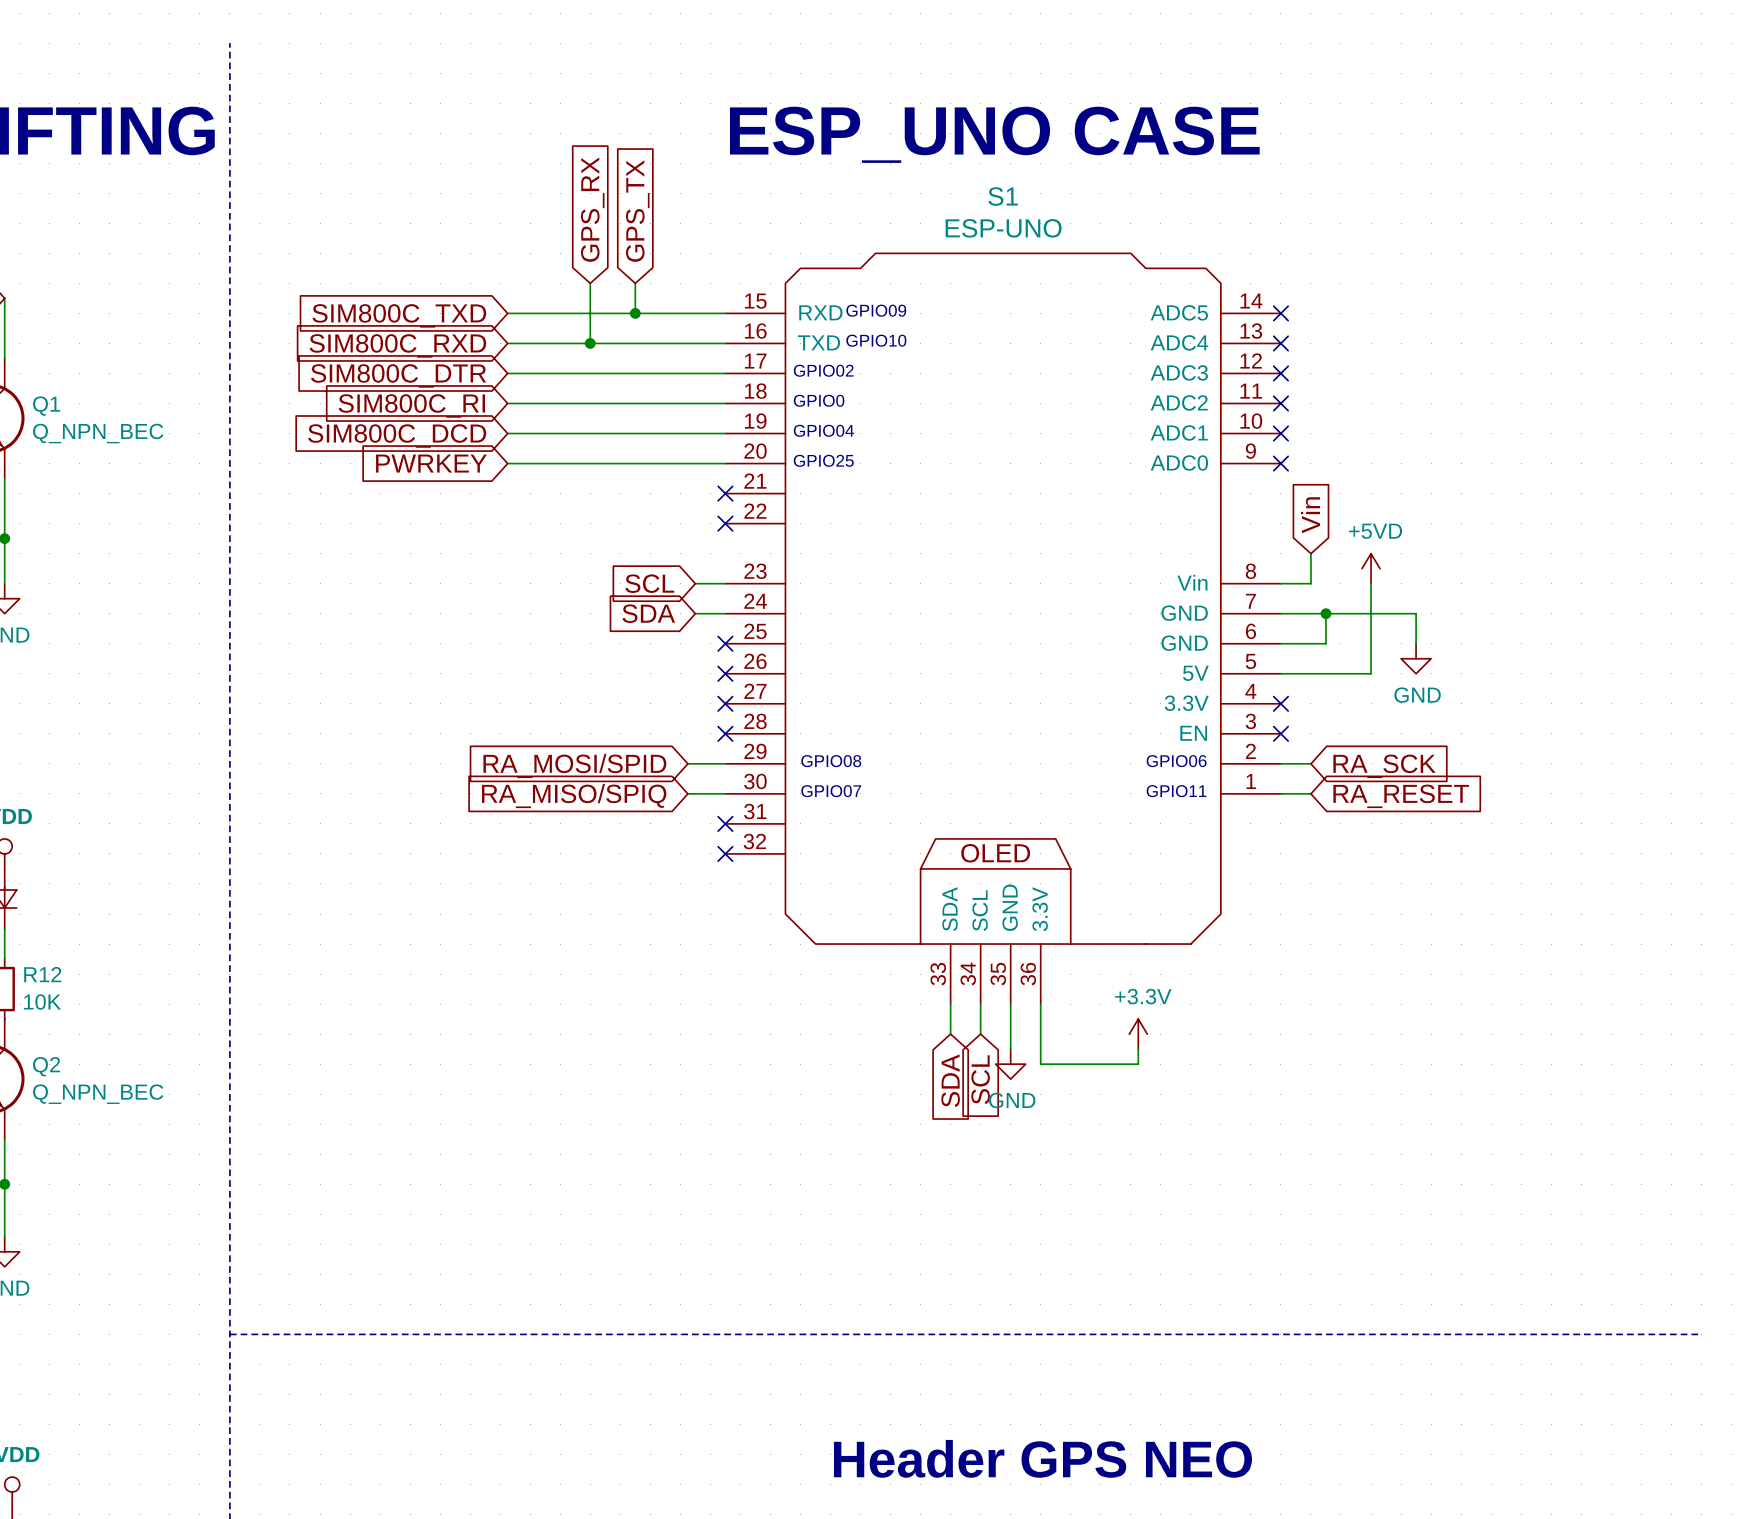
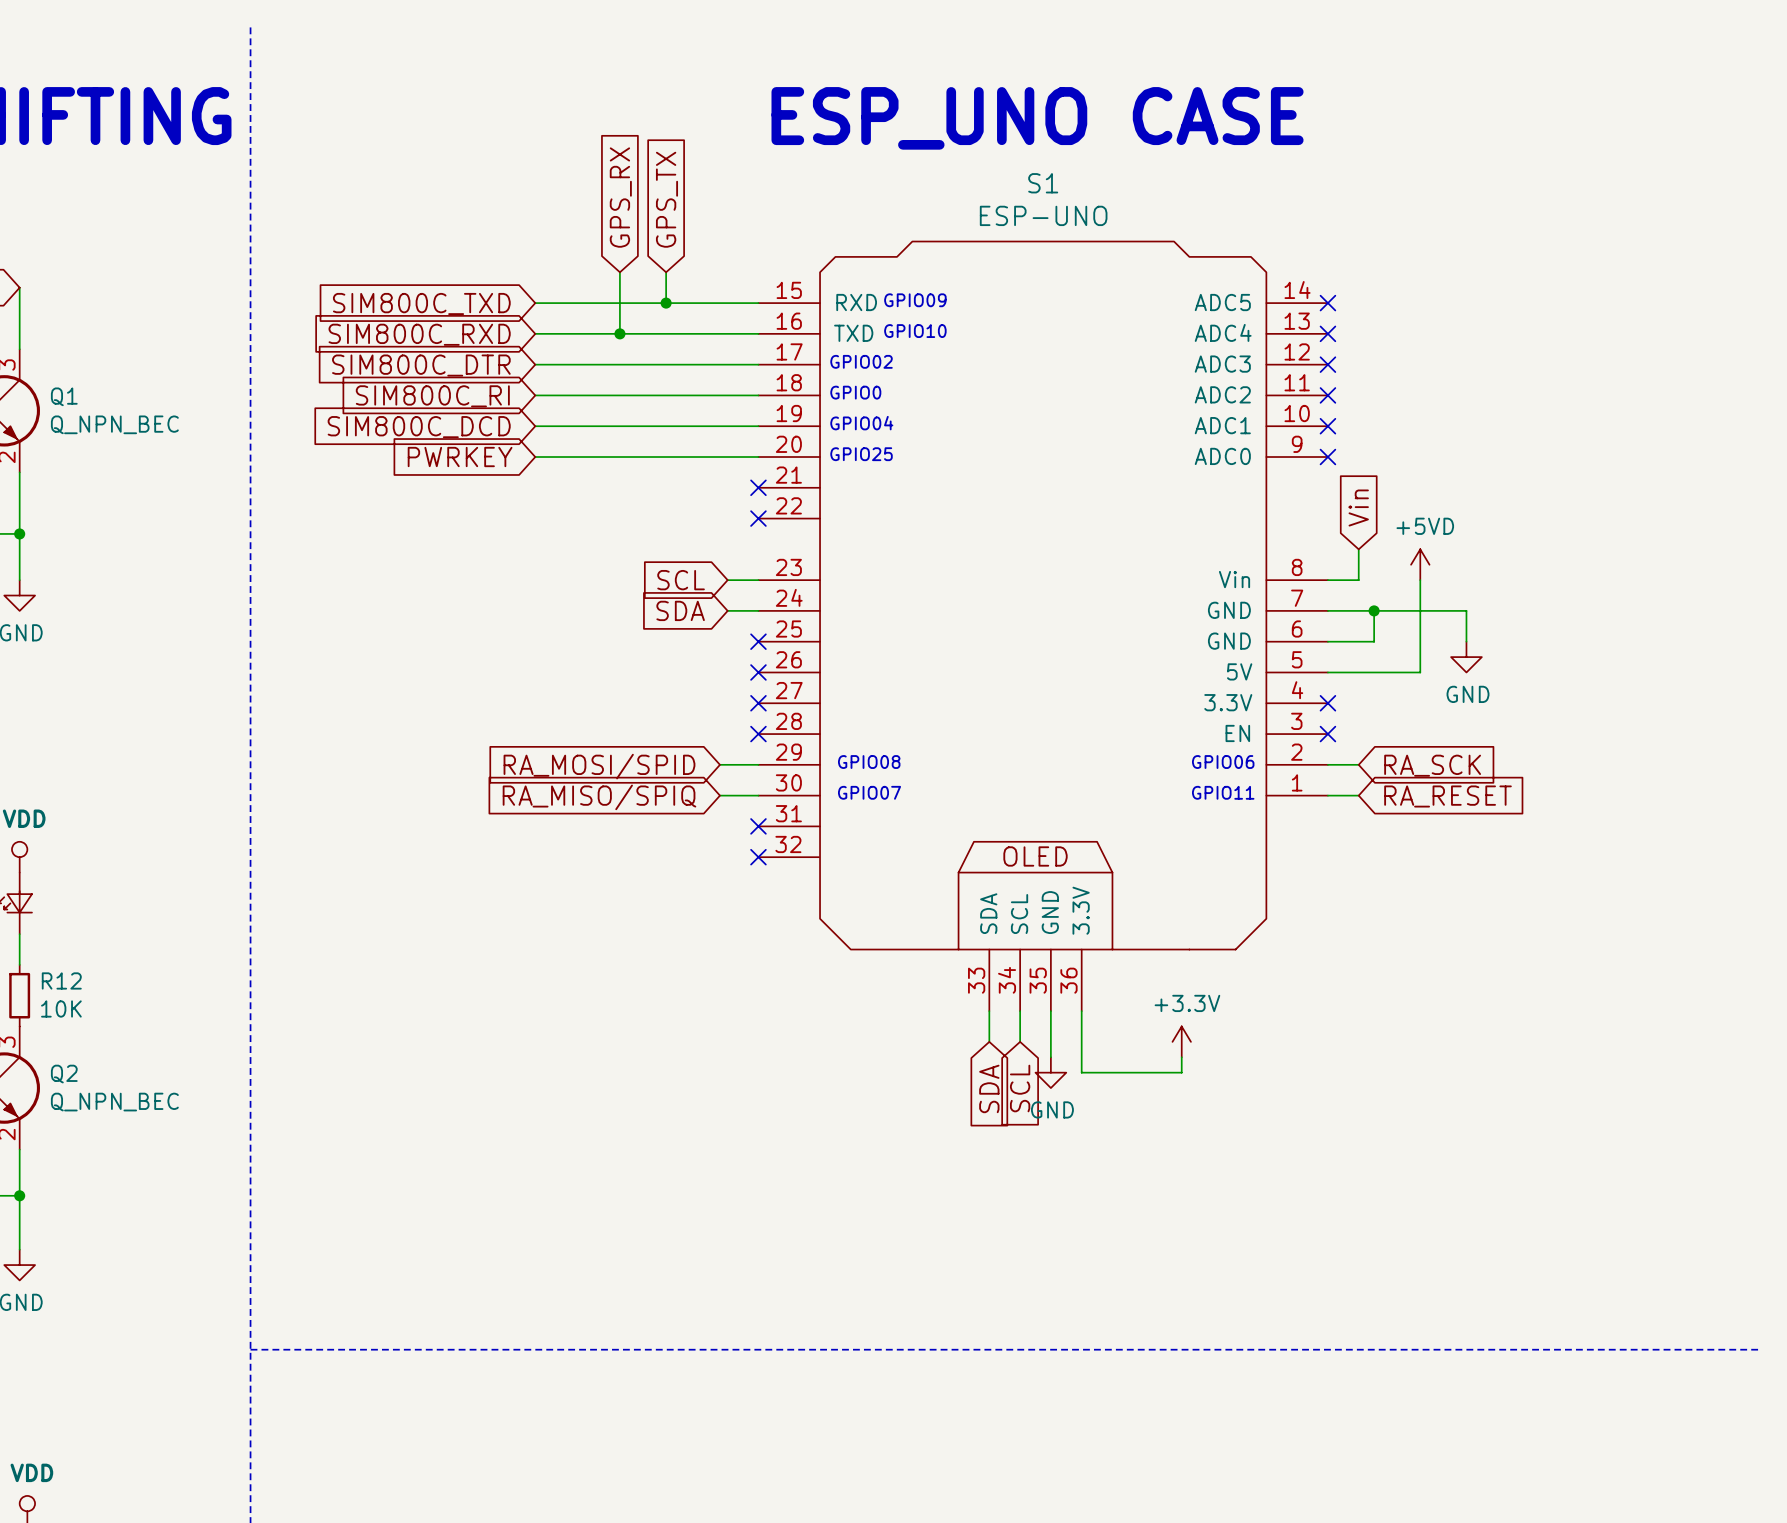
text: Header GPS NEO (1042, 1458) -> none

